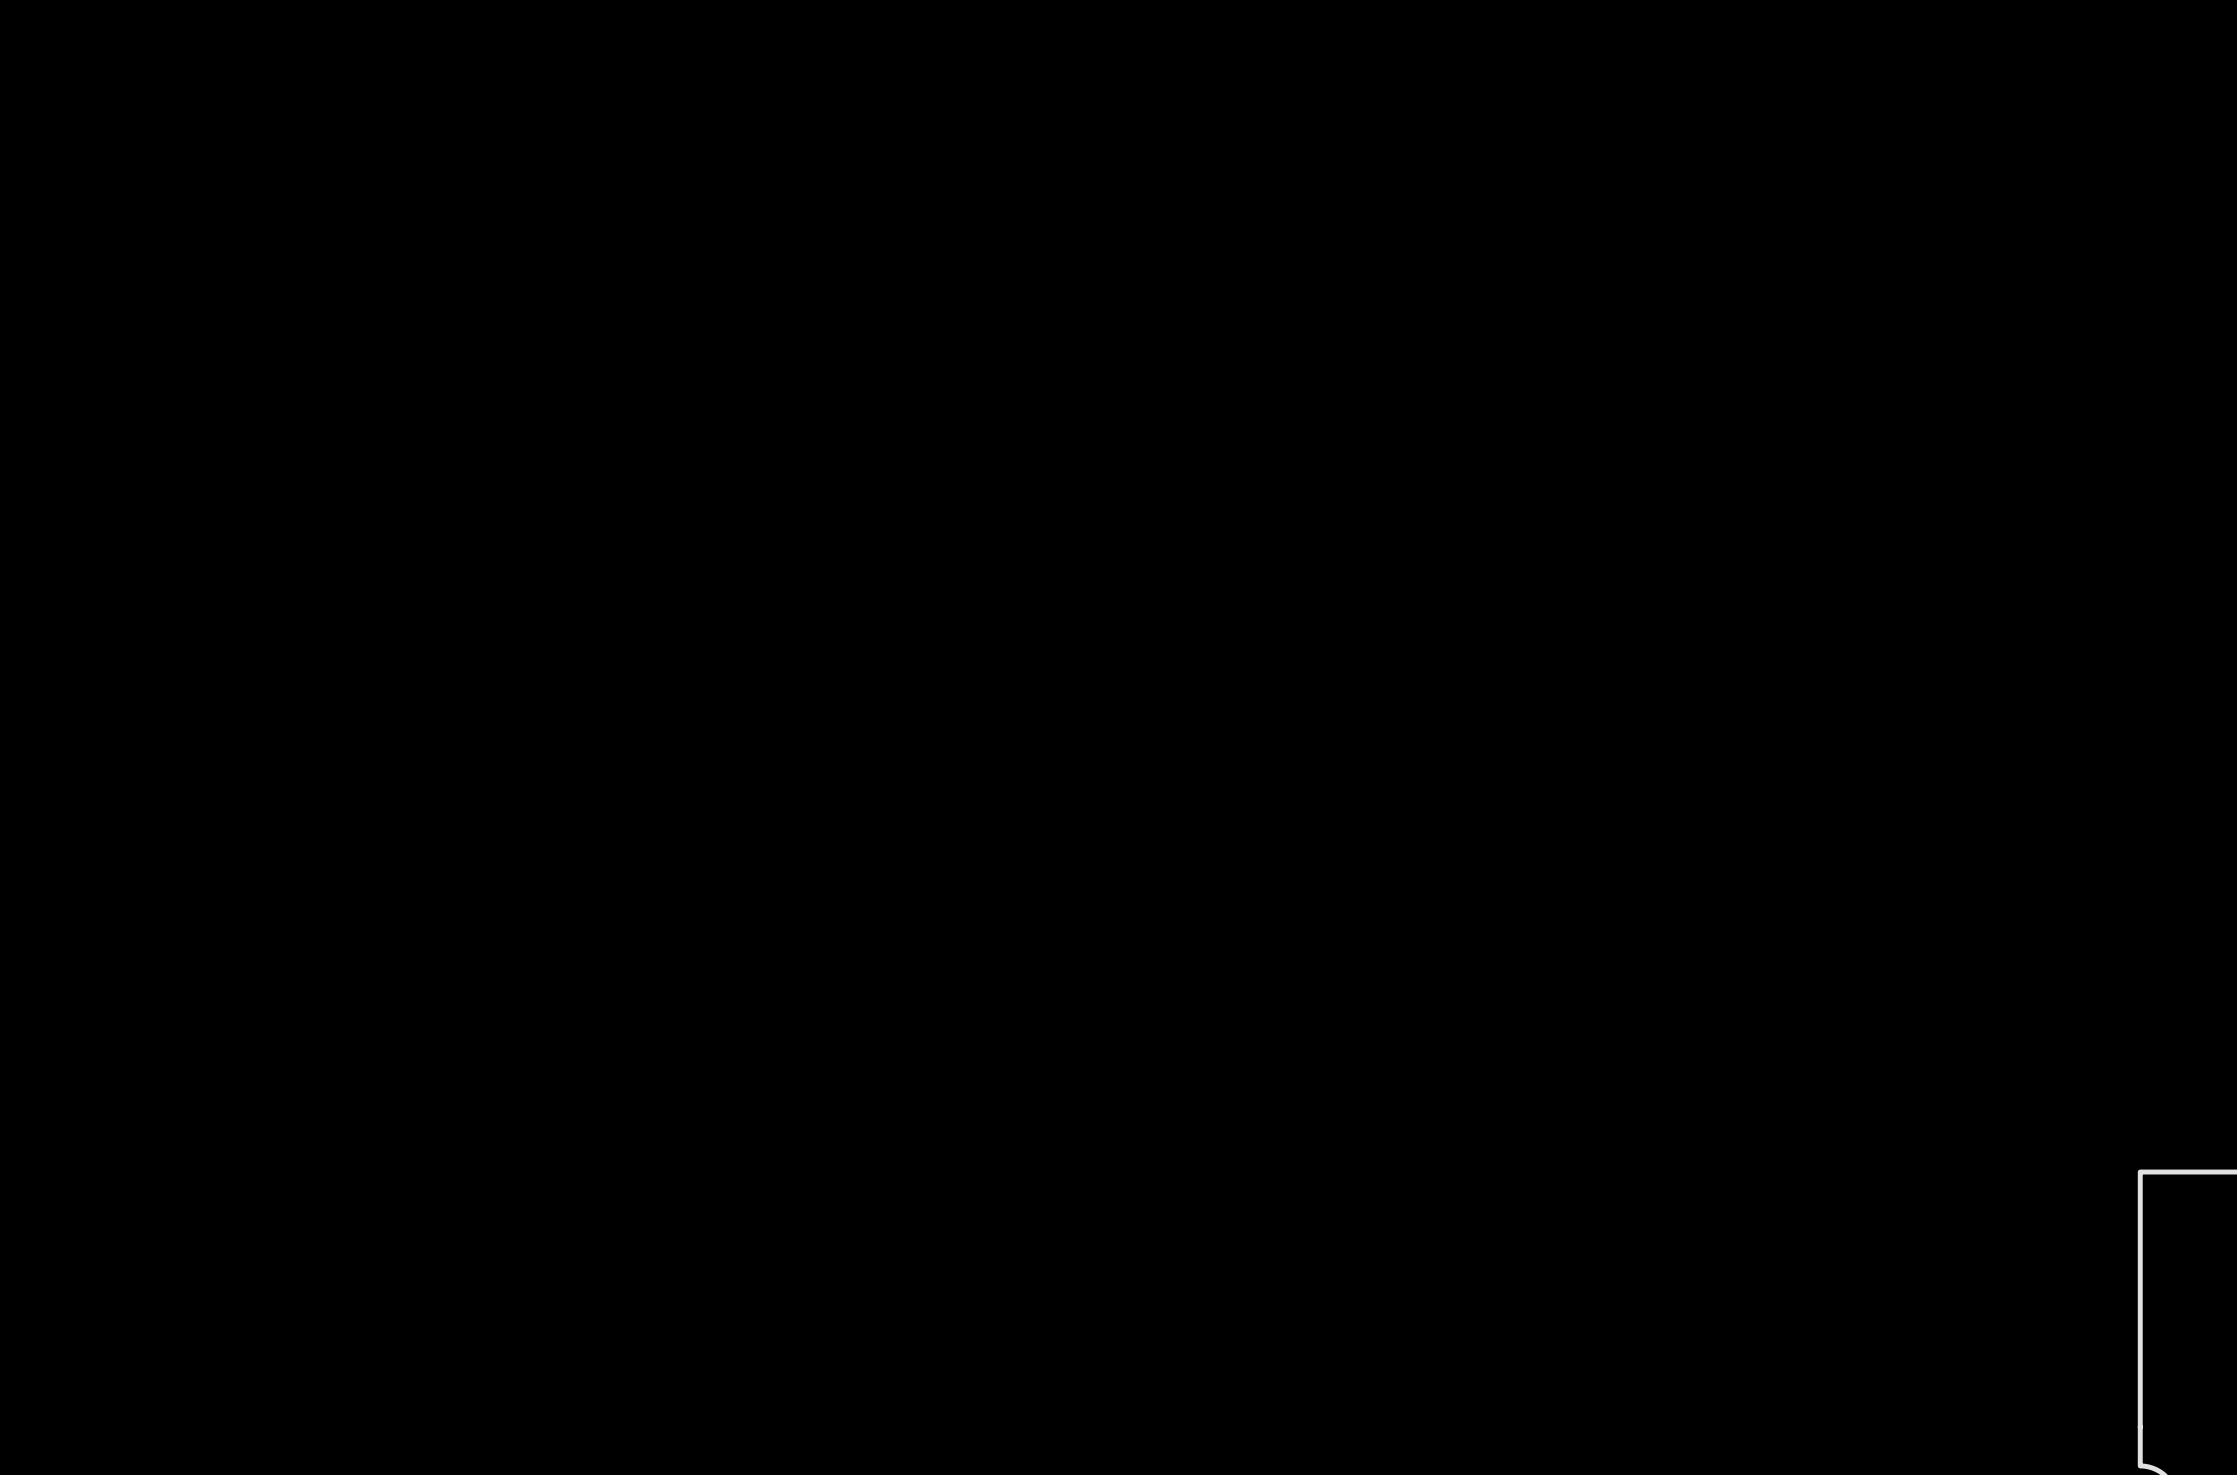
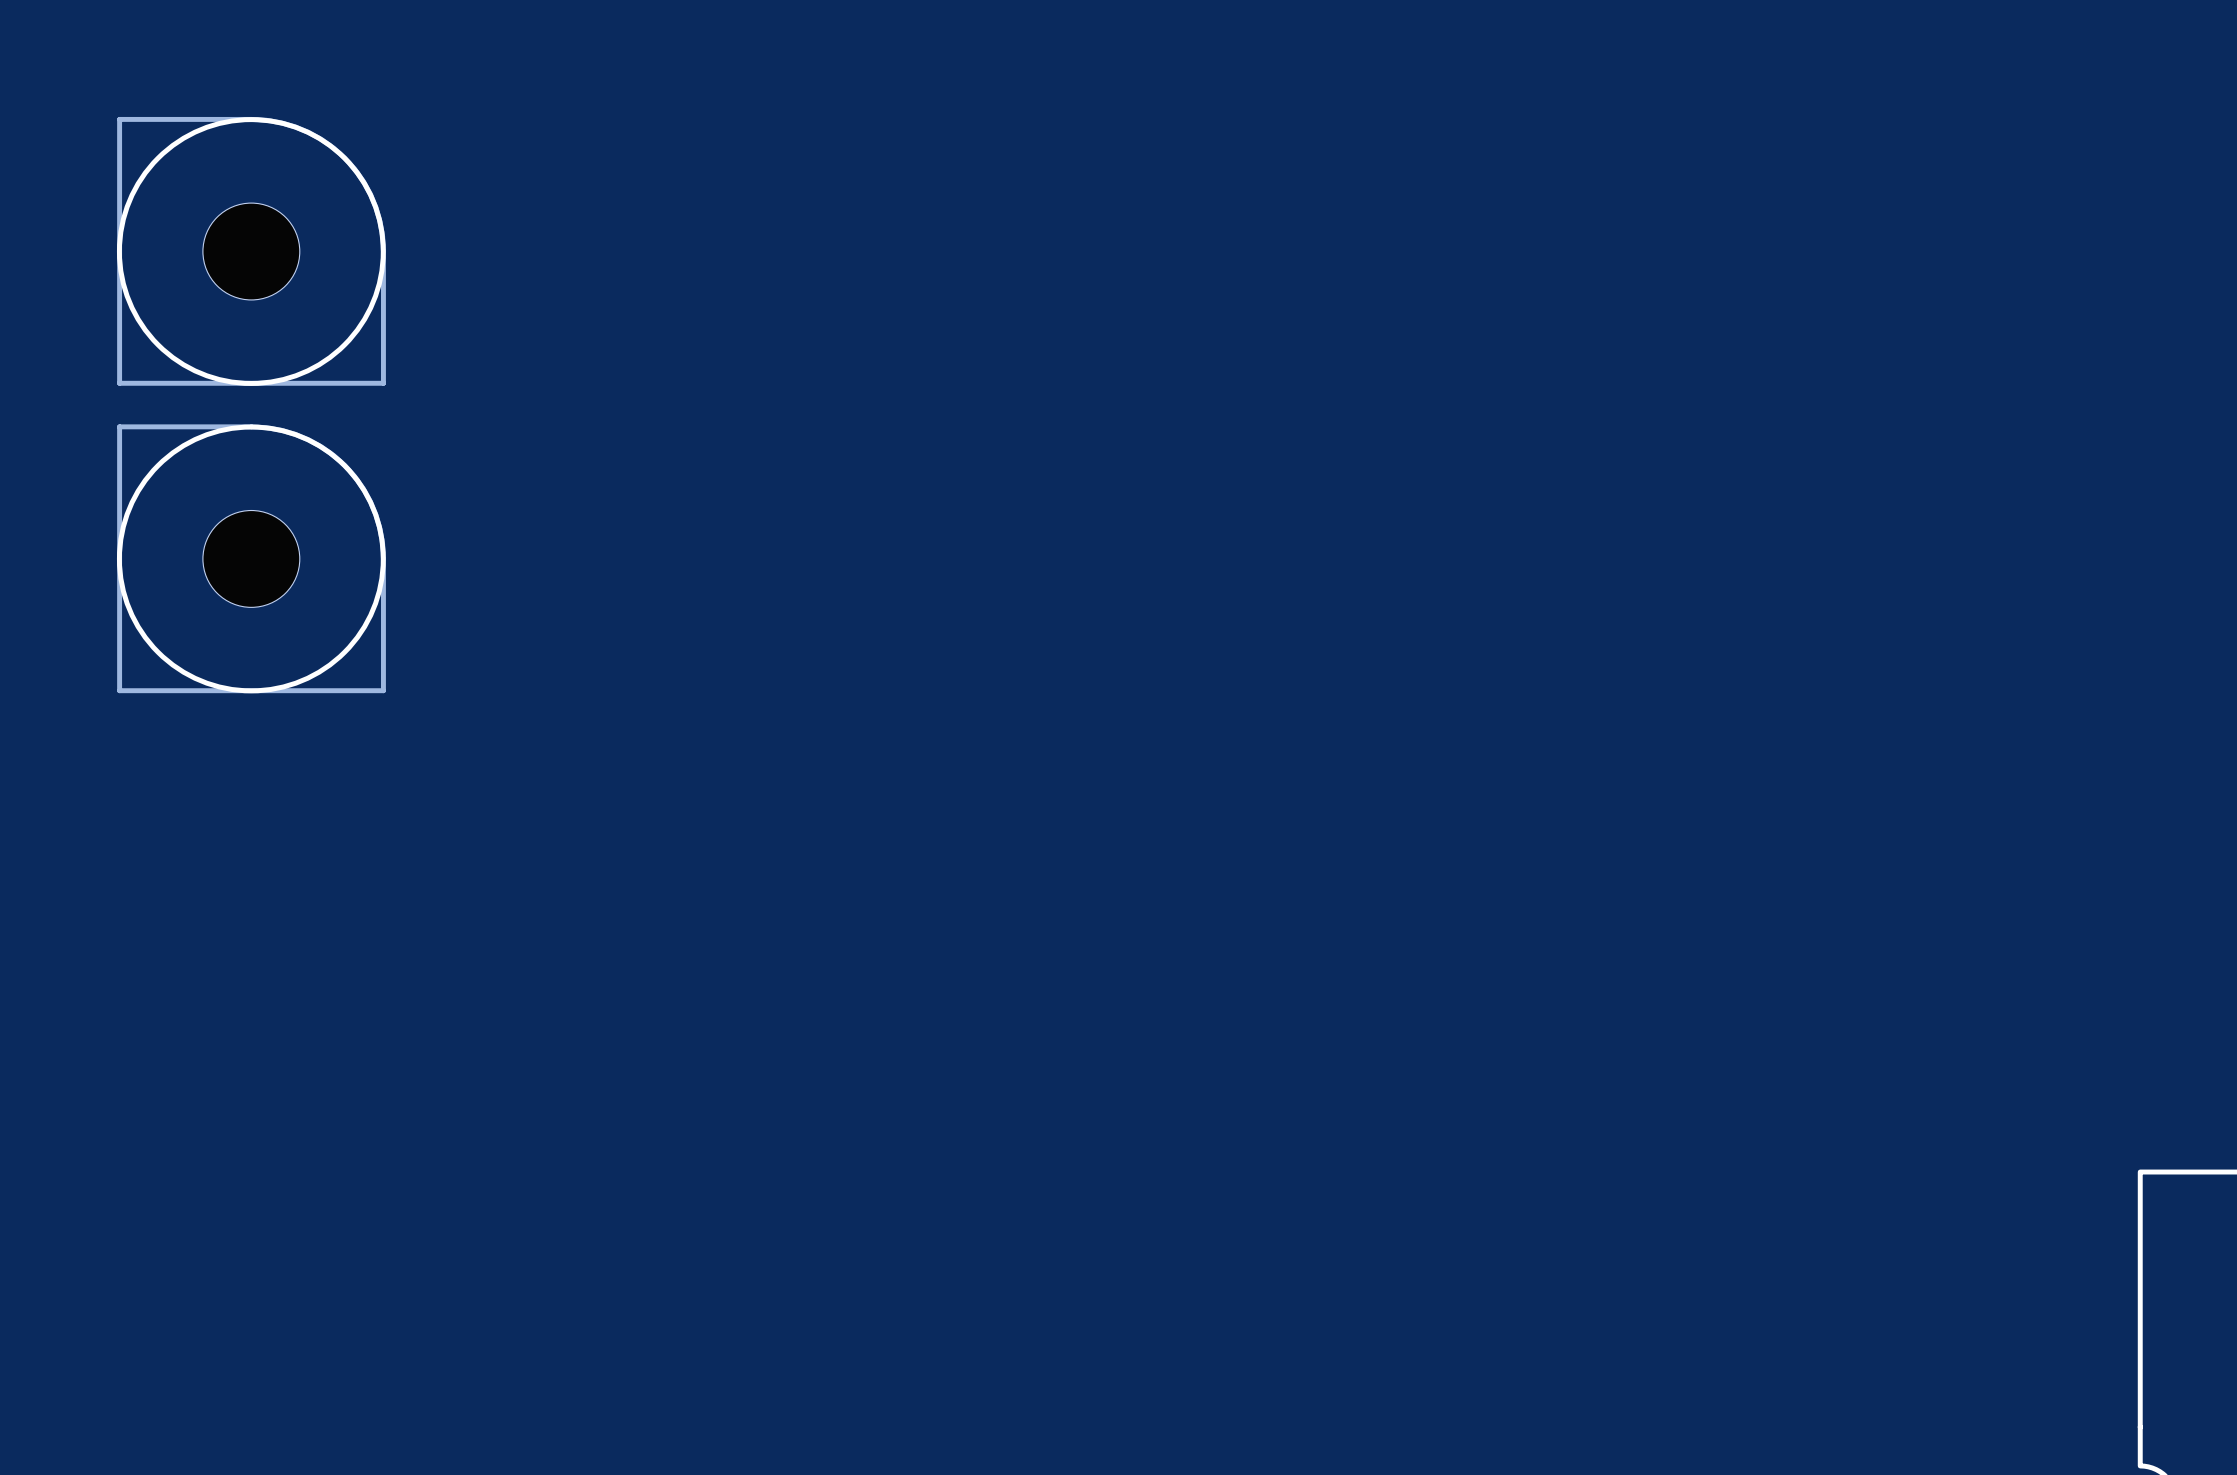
part: none -> (251, 251)
part: none -> (251, 558)

